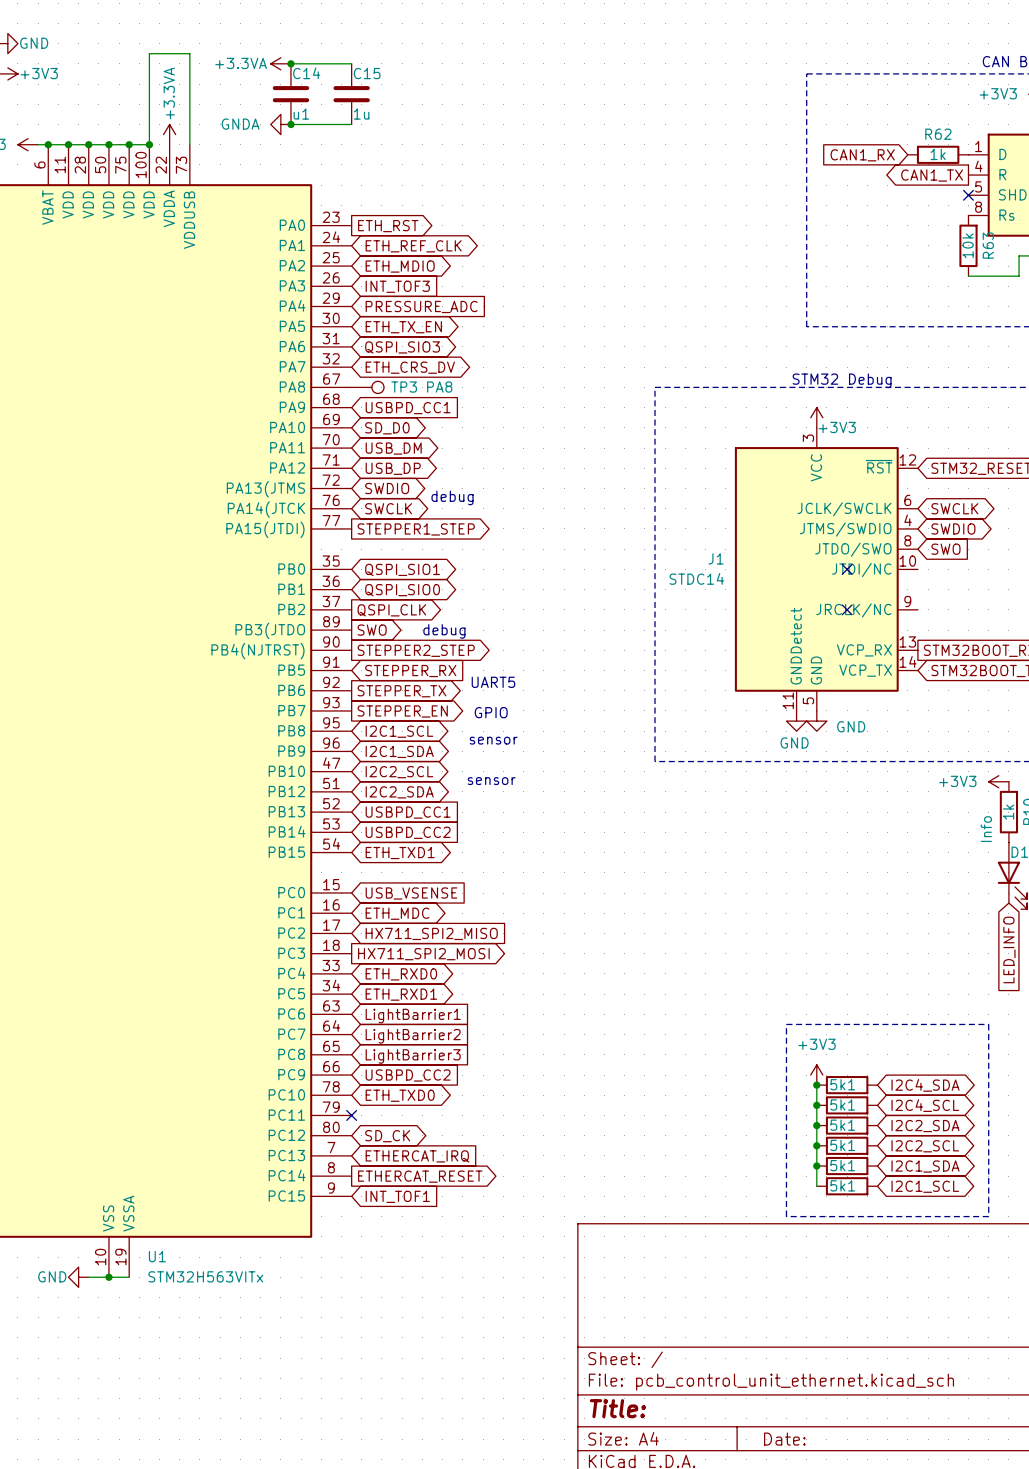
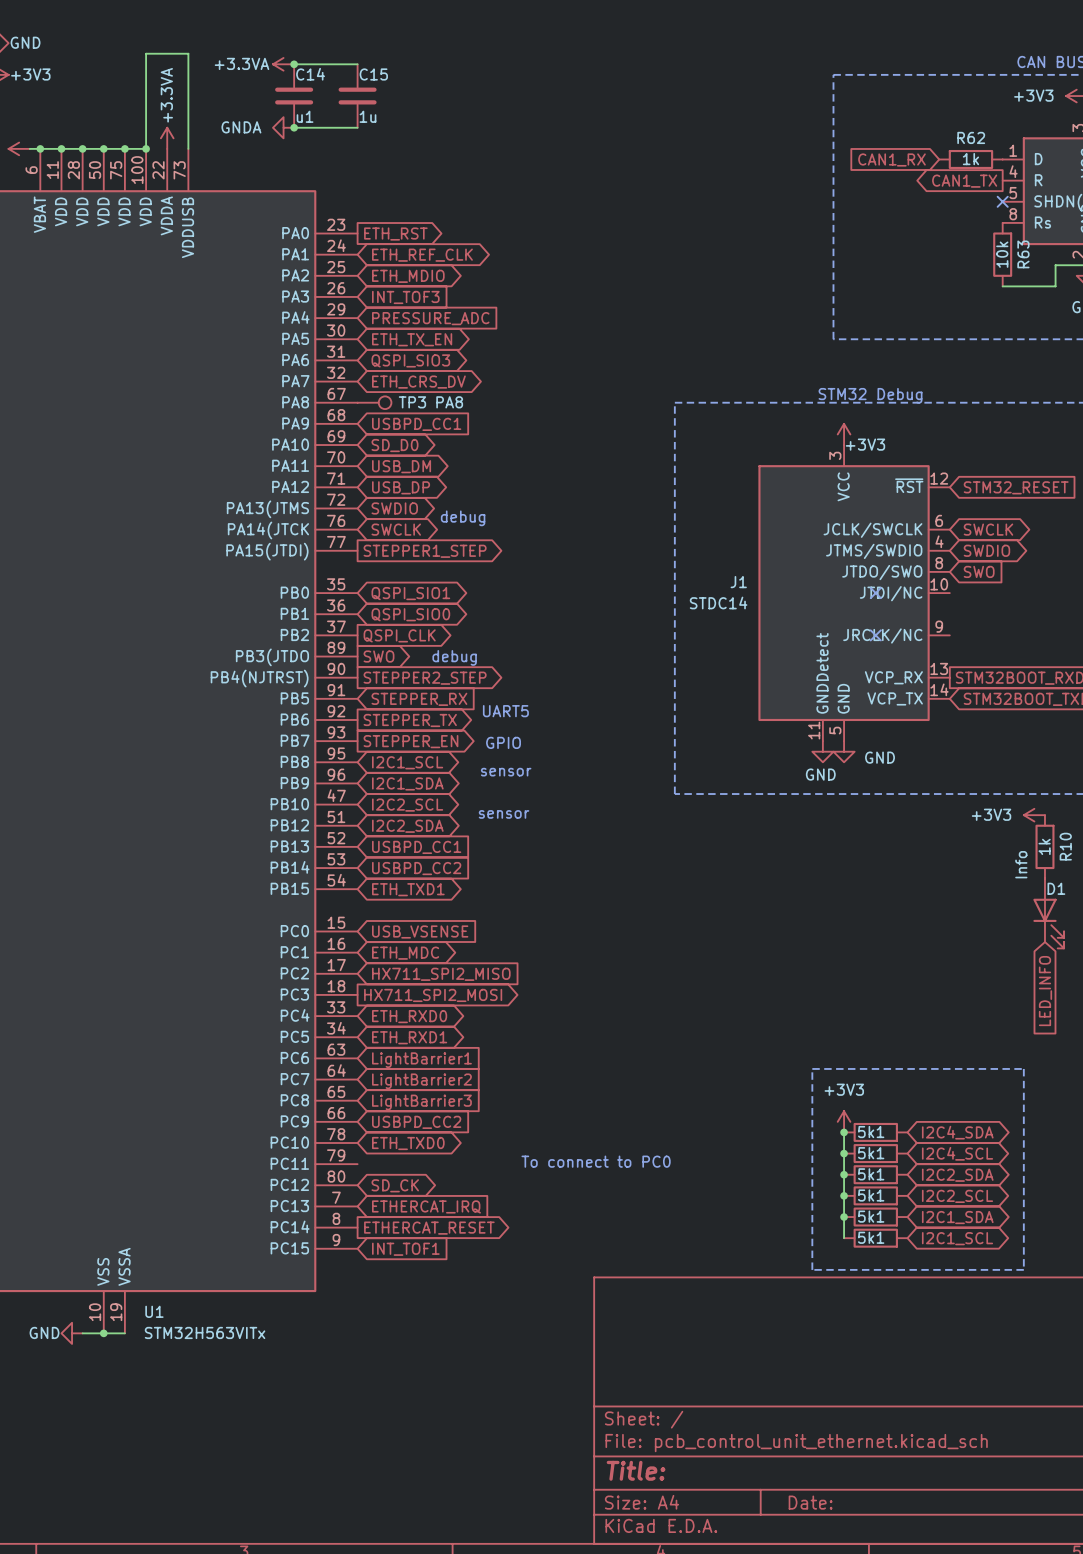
text: none -> To connect to PC0 (596, 1161)
no-connect mark: (351, 1115) -> none

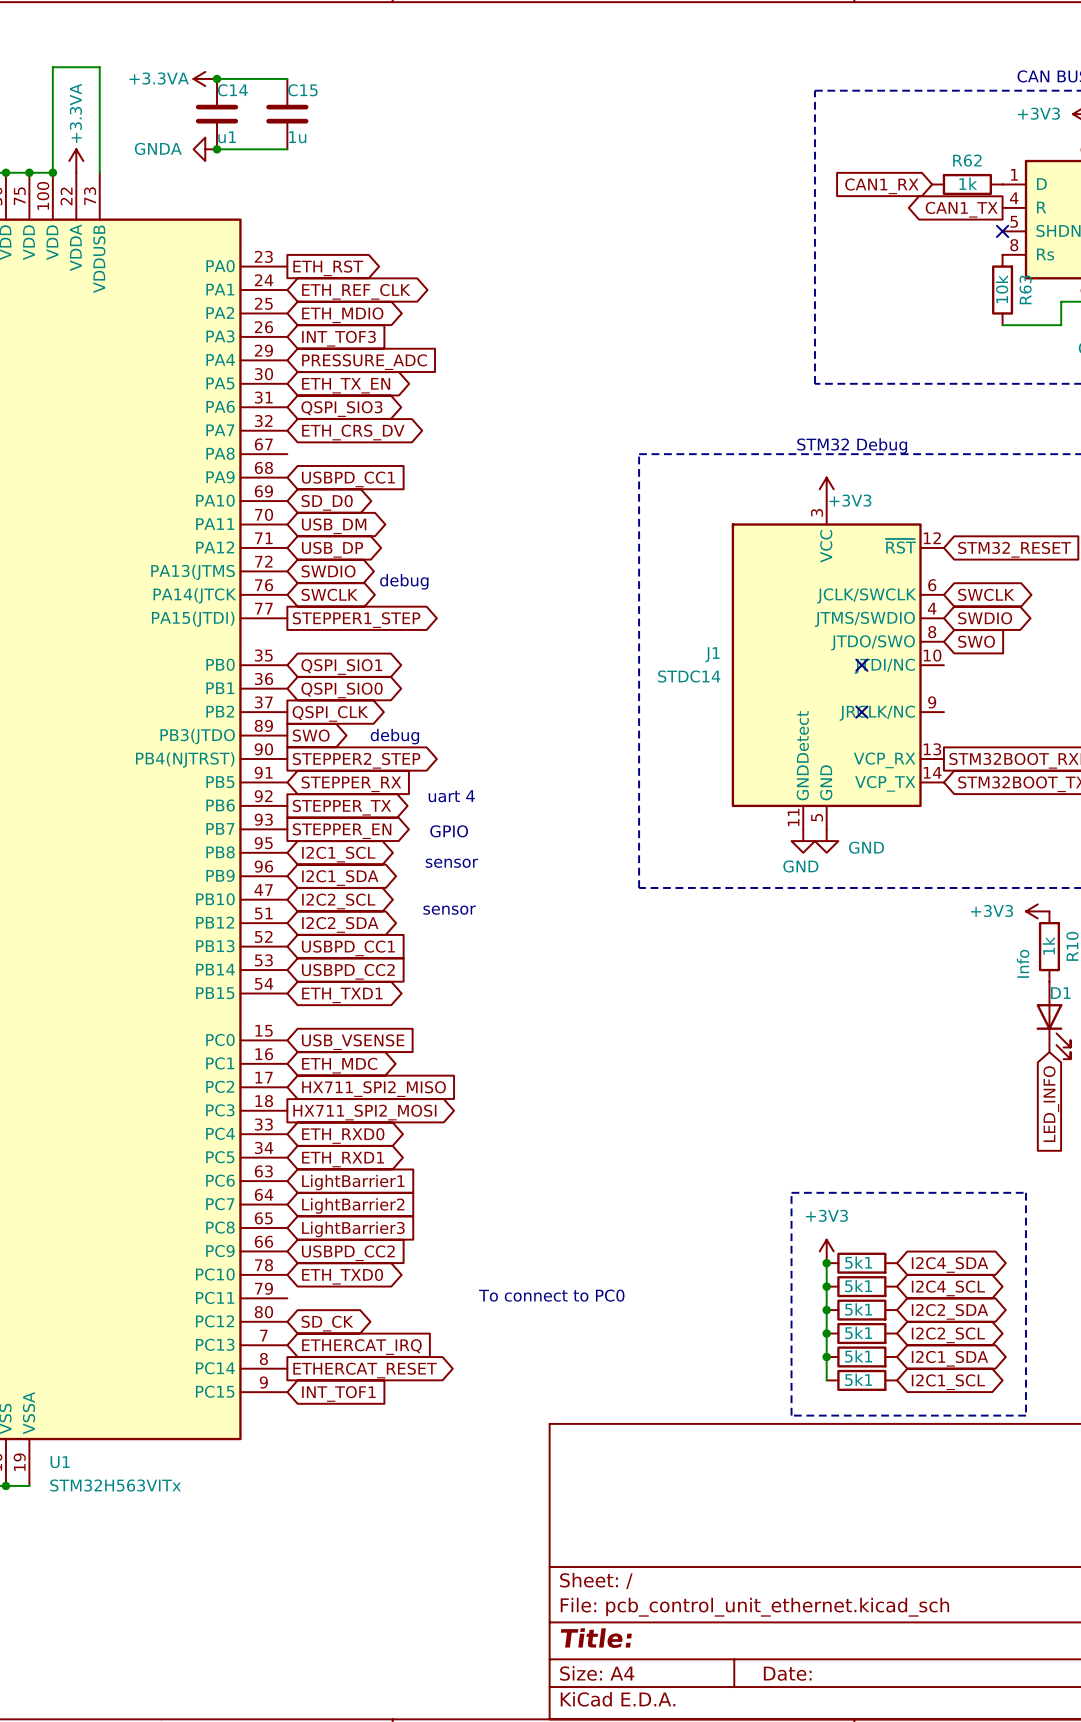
TP3: PA8 (374, 402) -> none
text: UART5 (505, 711) -> uart 4 (451, 796)

